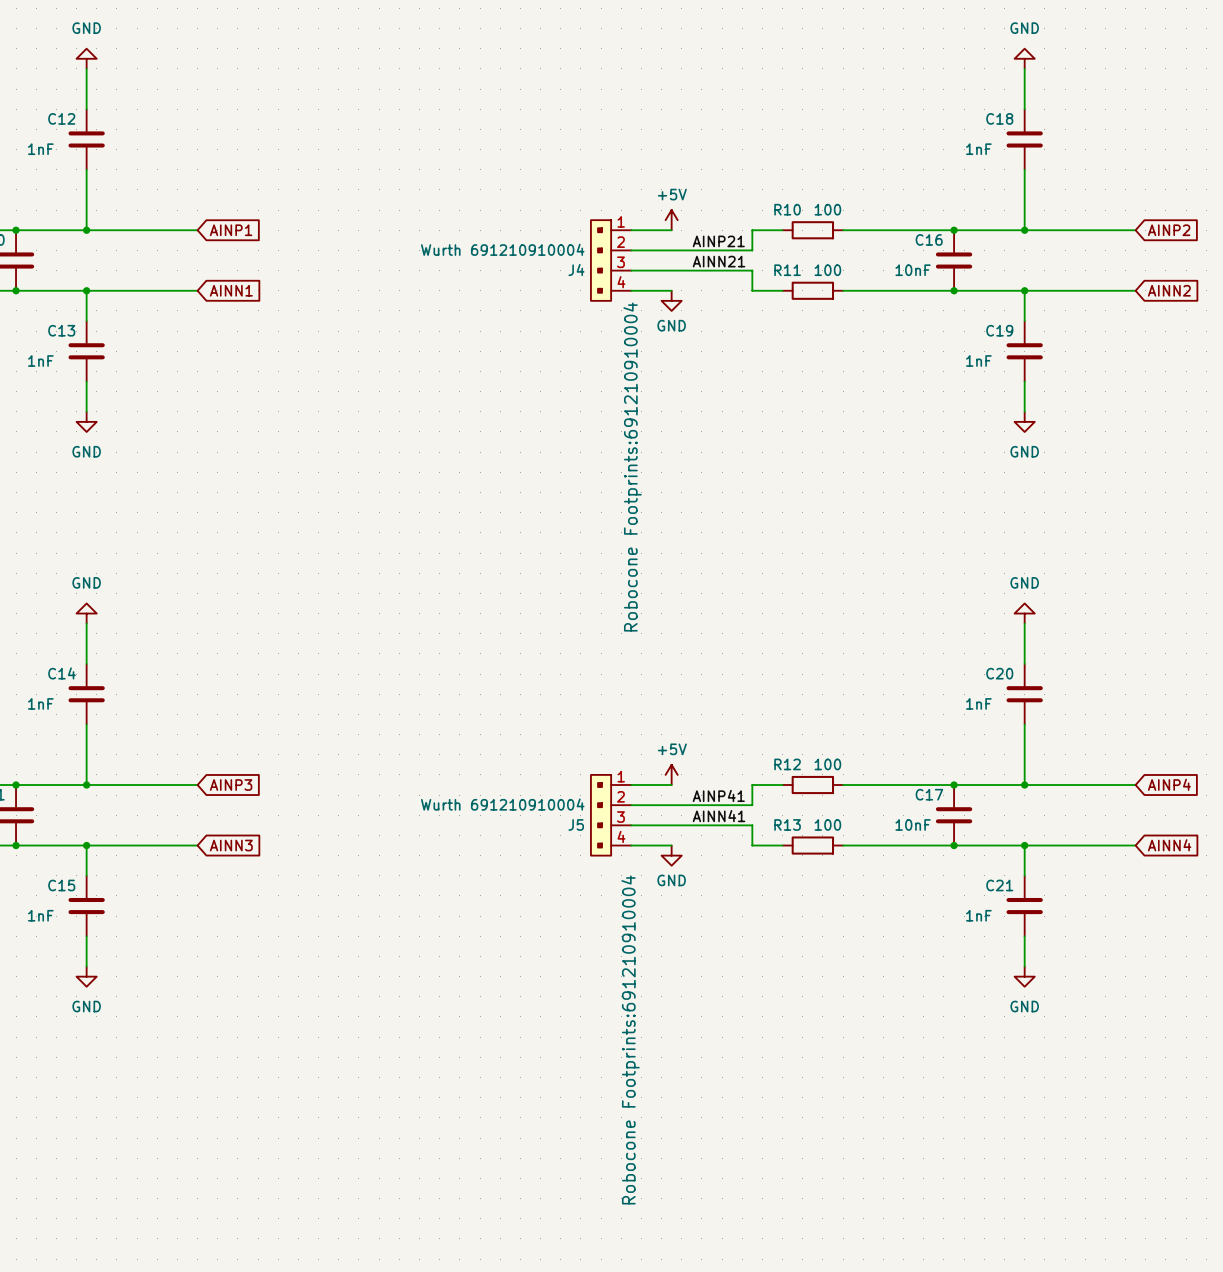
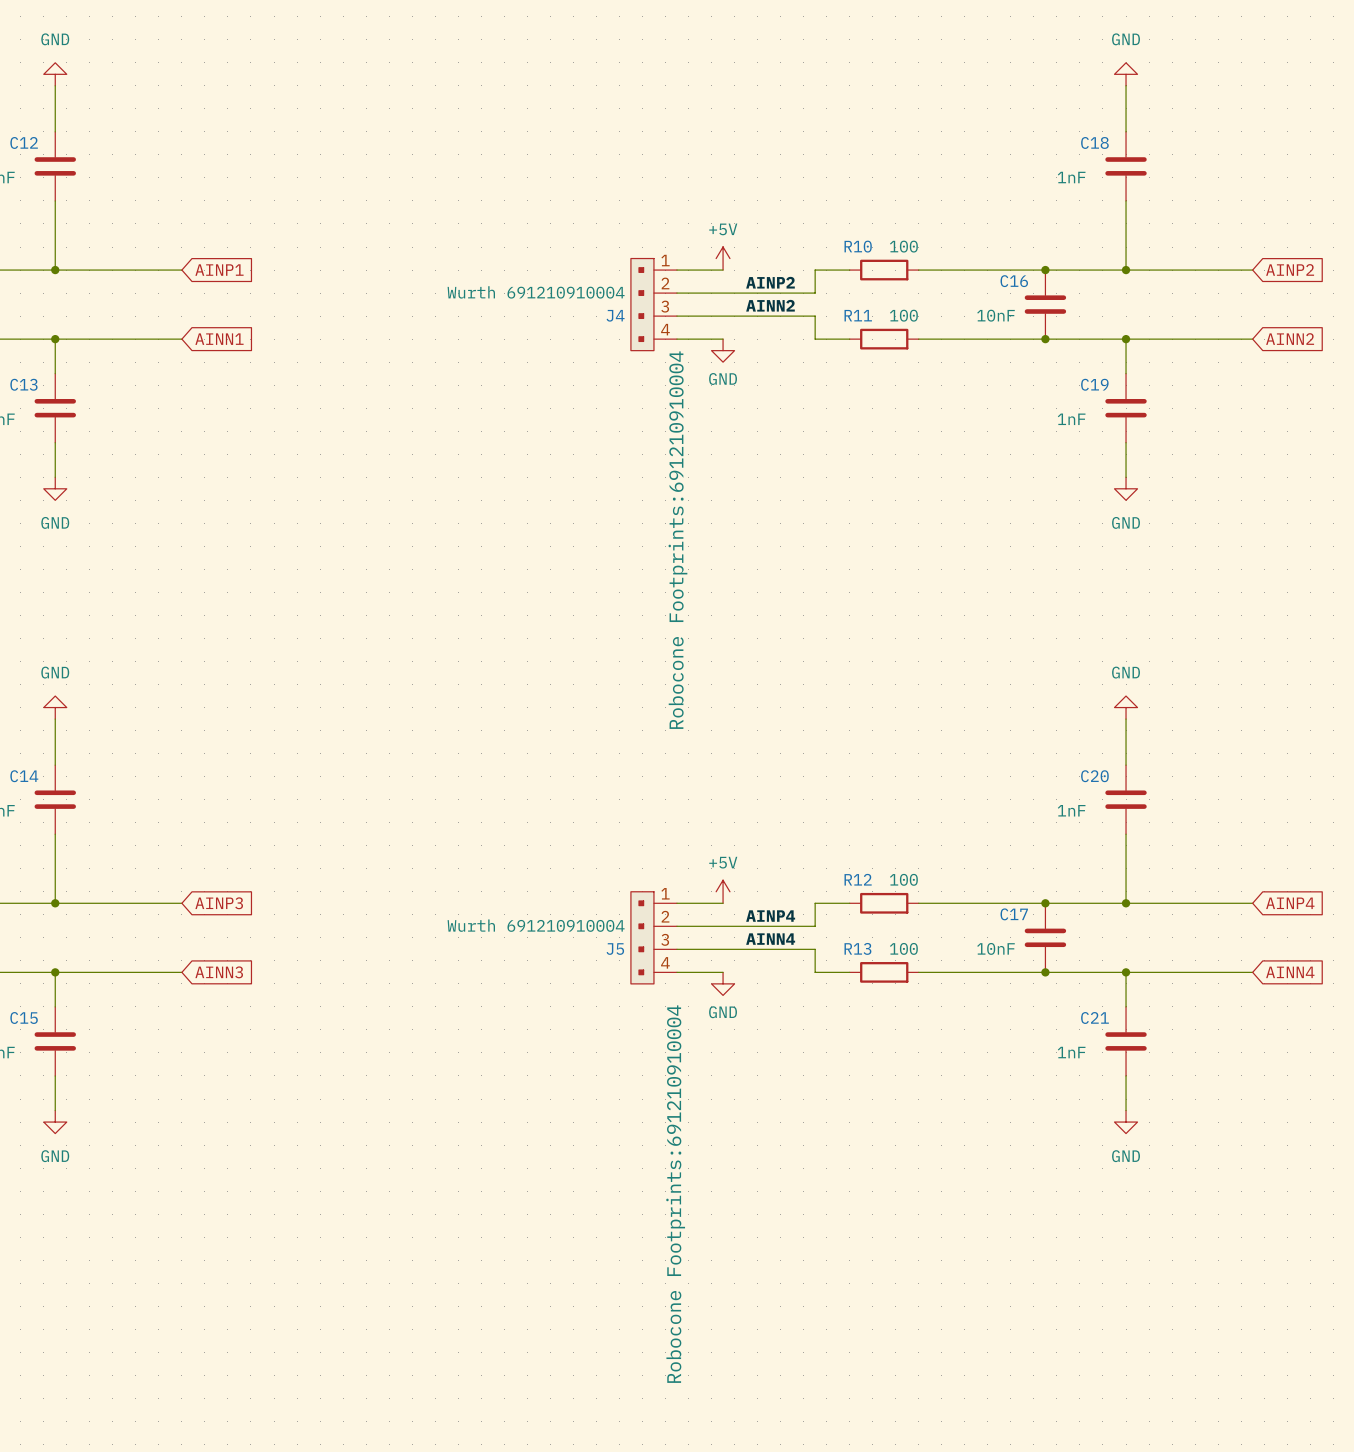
label: AINP21 (718, 241) -> AINP2 (770, 282)
label: AINN21 (719, 261) -> AINN2 (770, 305)
label: AINP41 (718, 795) -> AINP4 (770, 916)
label: AINN41 (719, 816) -> AINN4 (770, 939)

